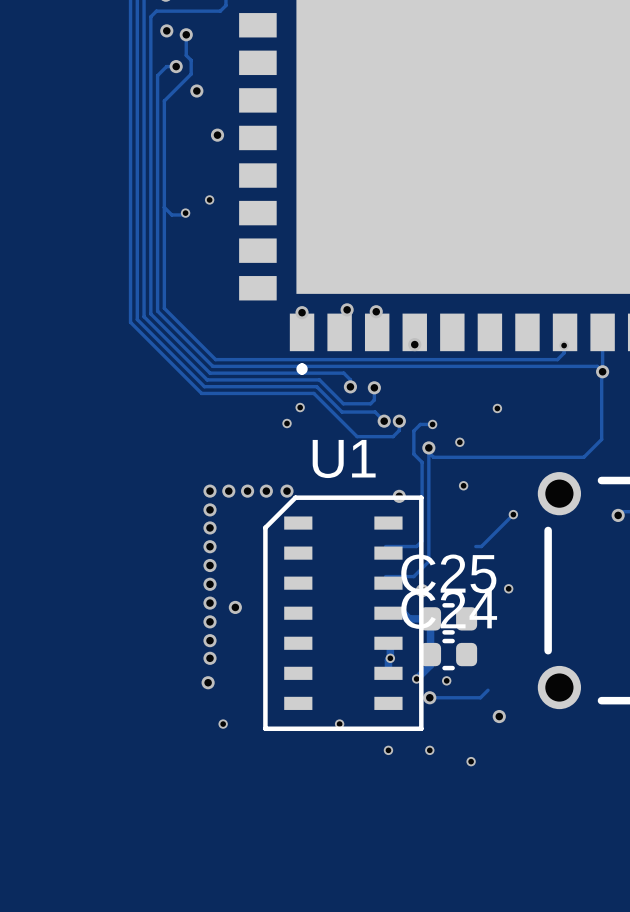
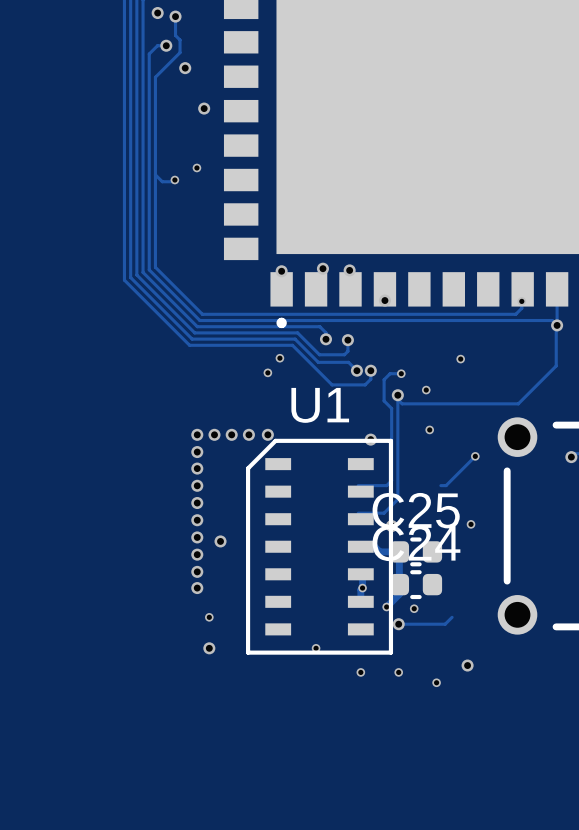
track: (601, 415) (601, 439) (583, 457) (560, 457) -> (556, 365) (518, 403)
via position: (208, 682) -> (209, 648)
via position: (499, 716) -> (467, 665)
via position: (223, 724) -> (209, 617)

